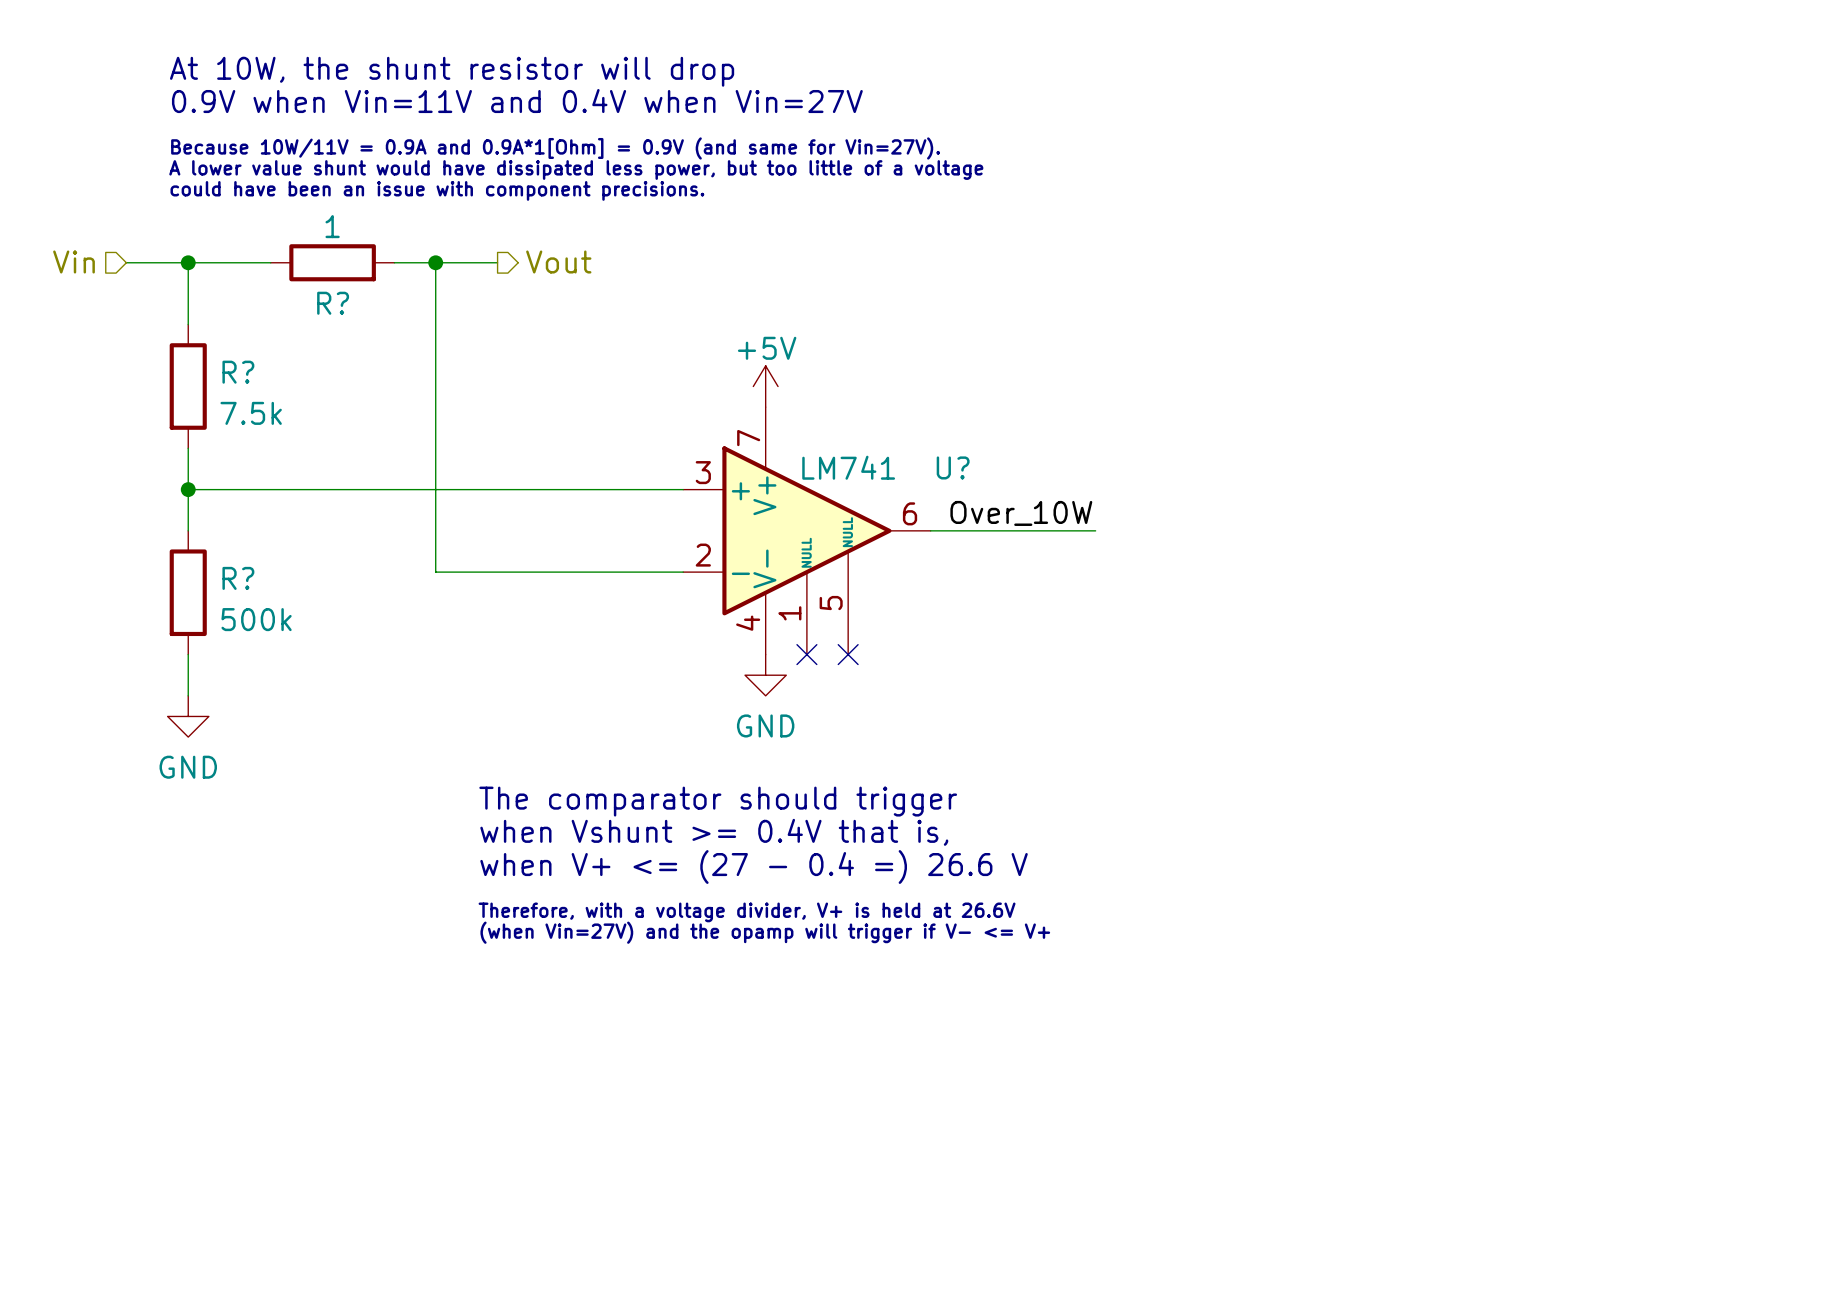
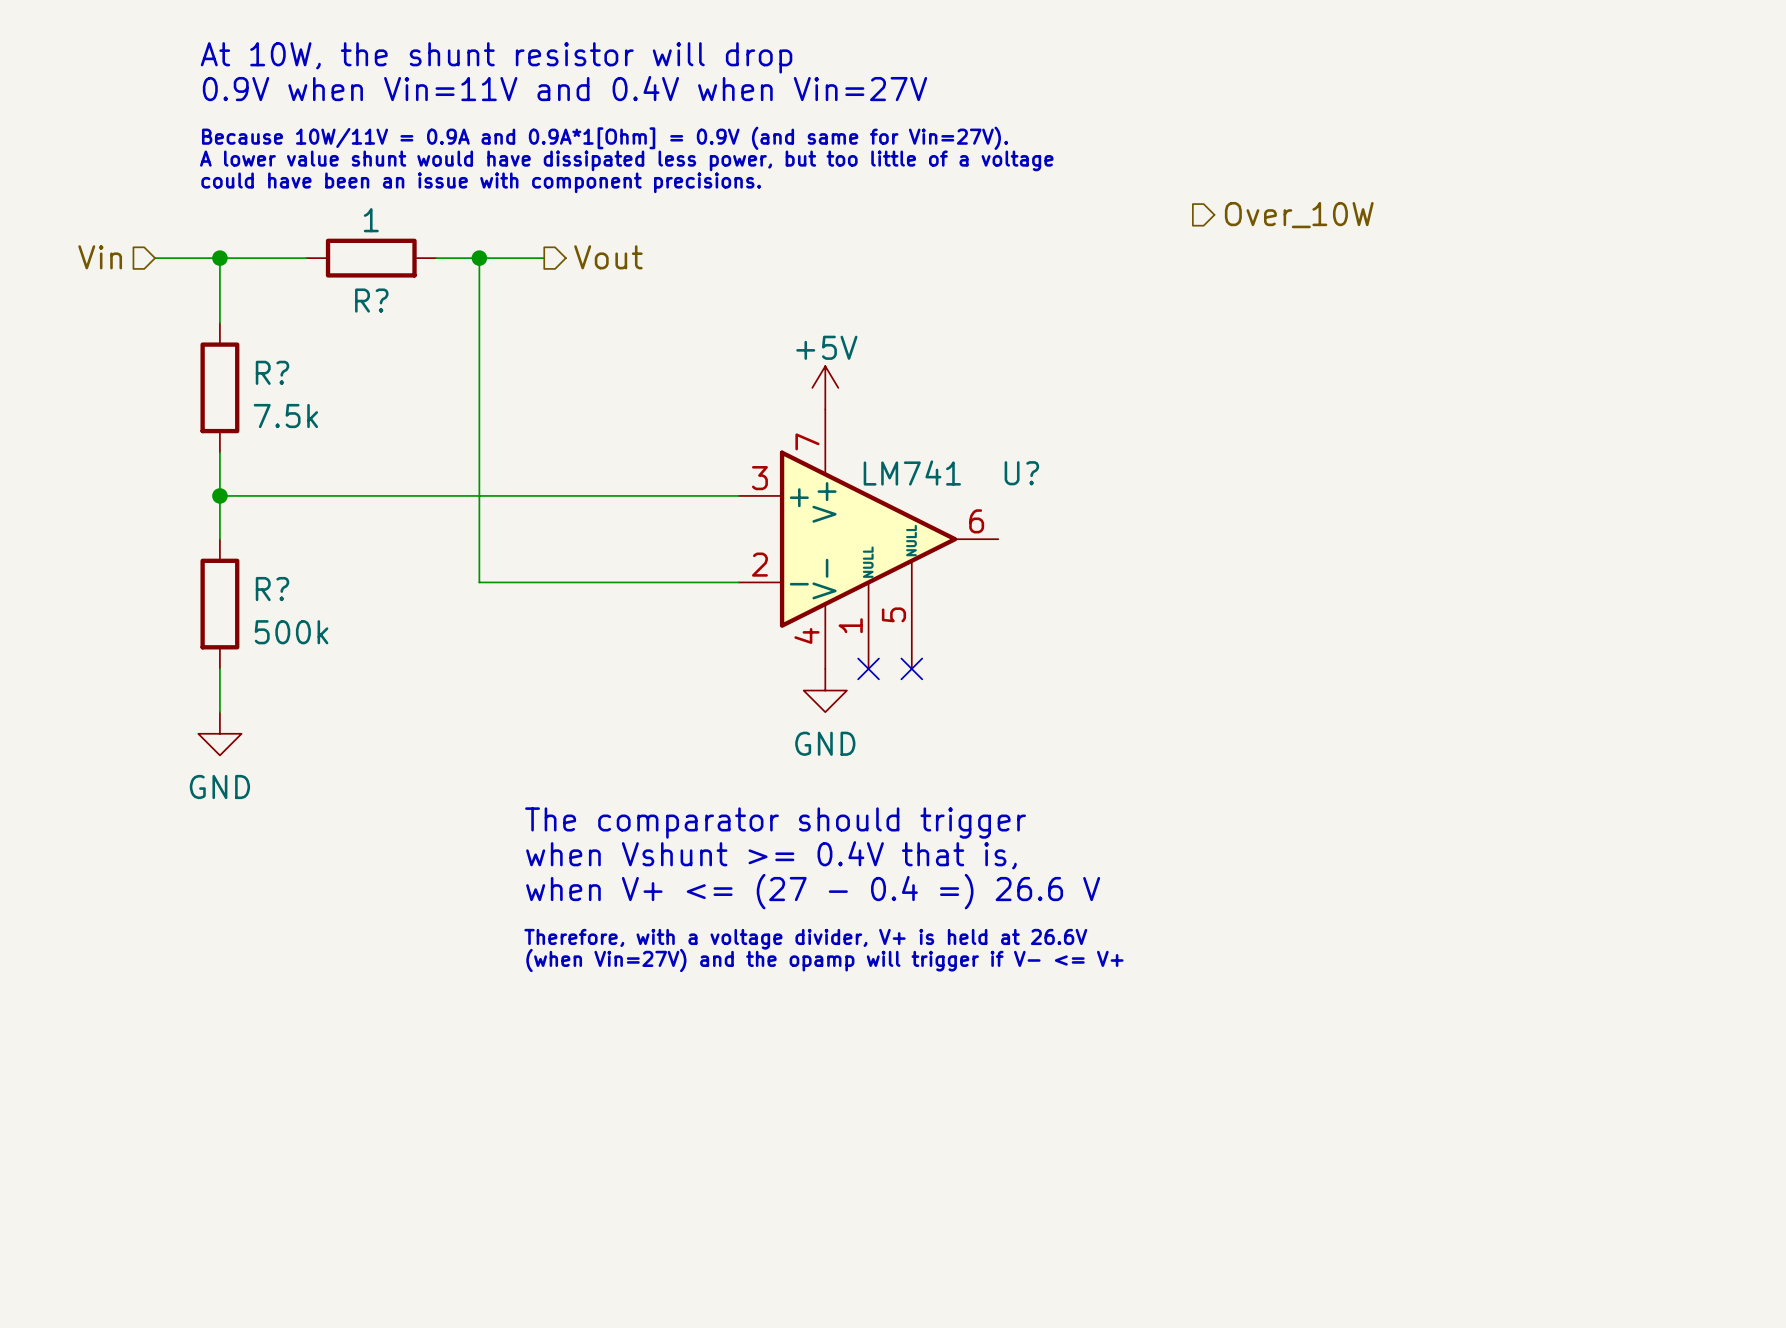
hierarchical label: none -> Over_10W (1299, 215)
label: Over_10W (1021, 513) -> none
wire: (930, 530) (1095, 530) -> none

